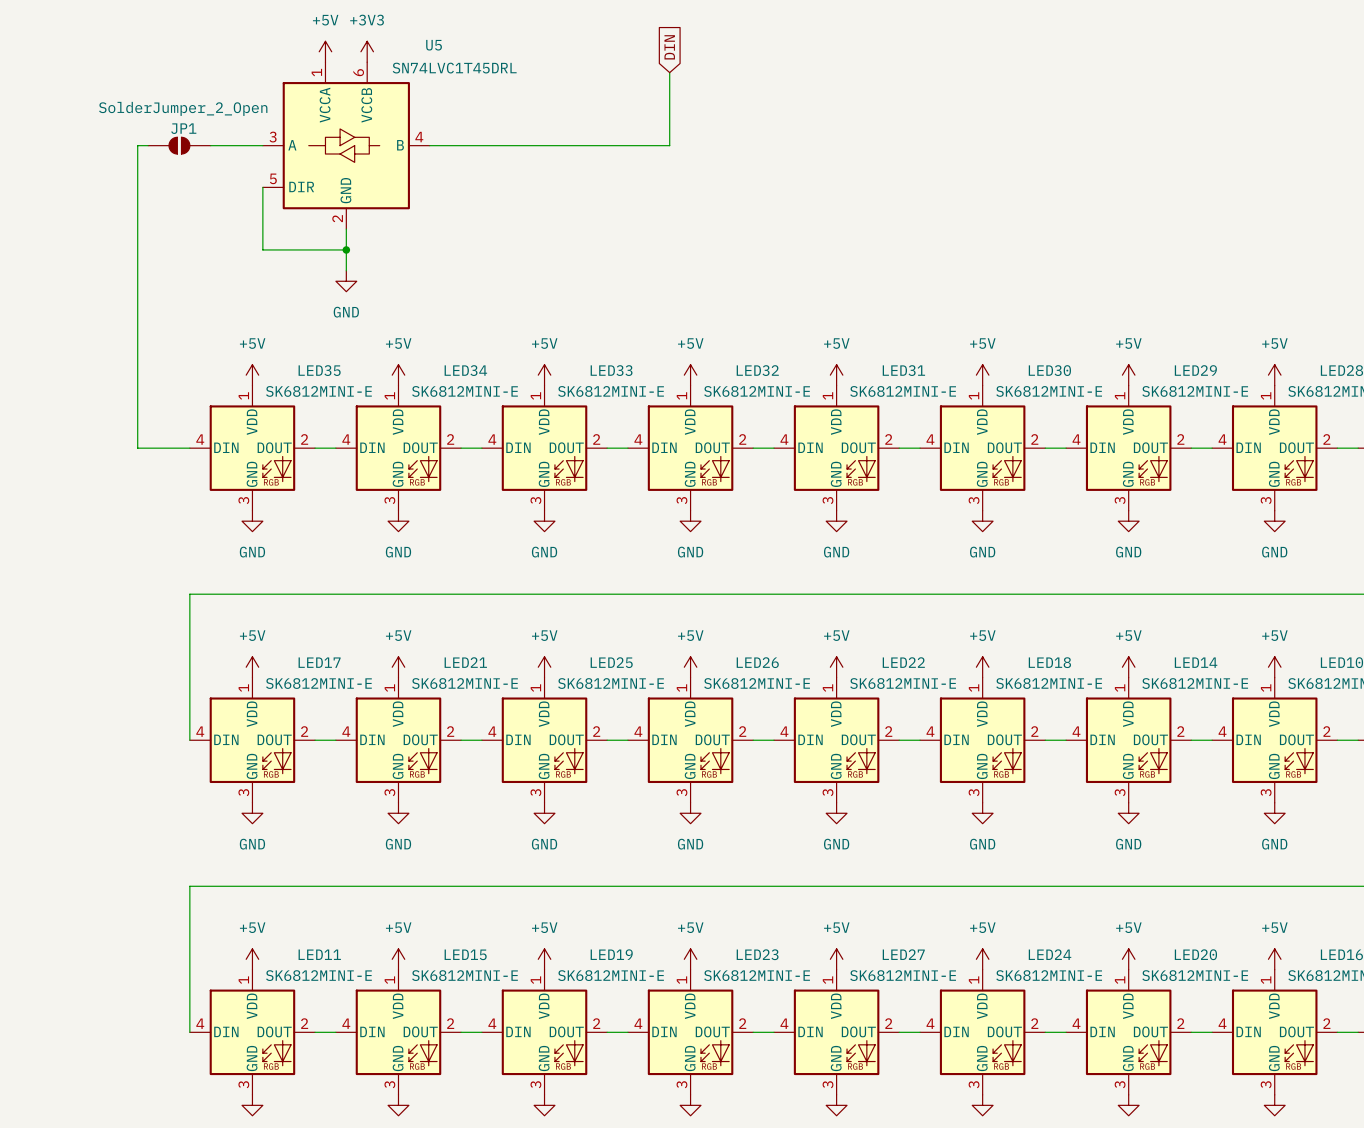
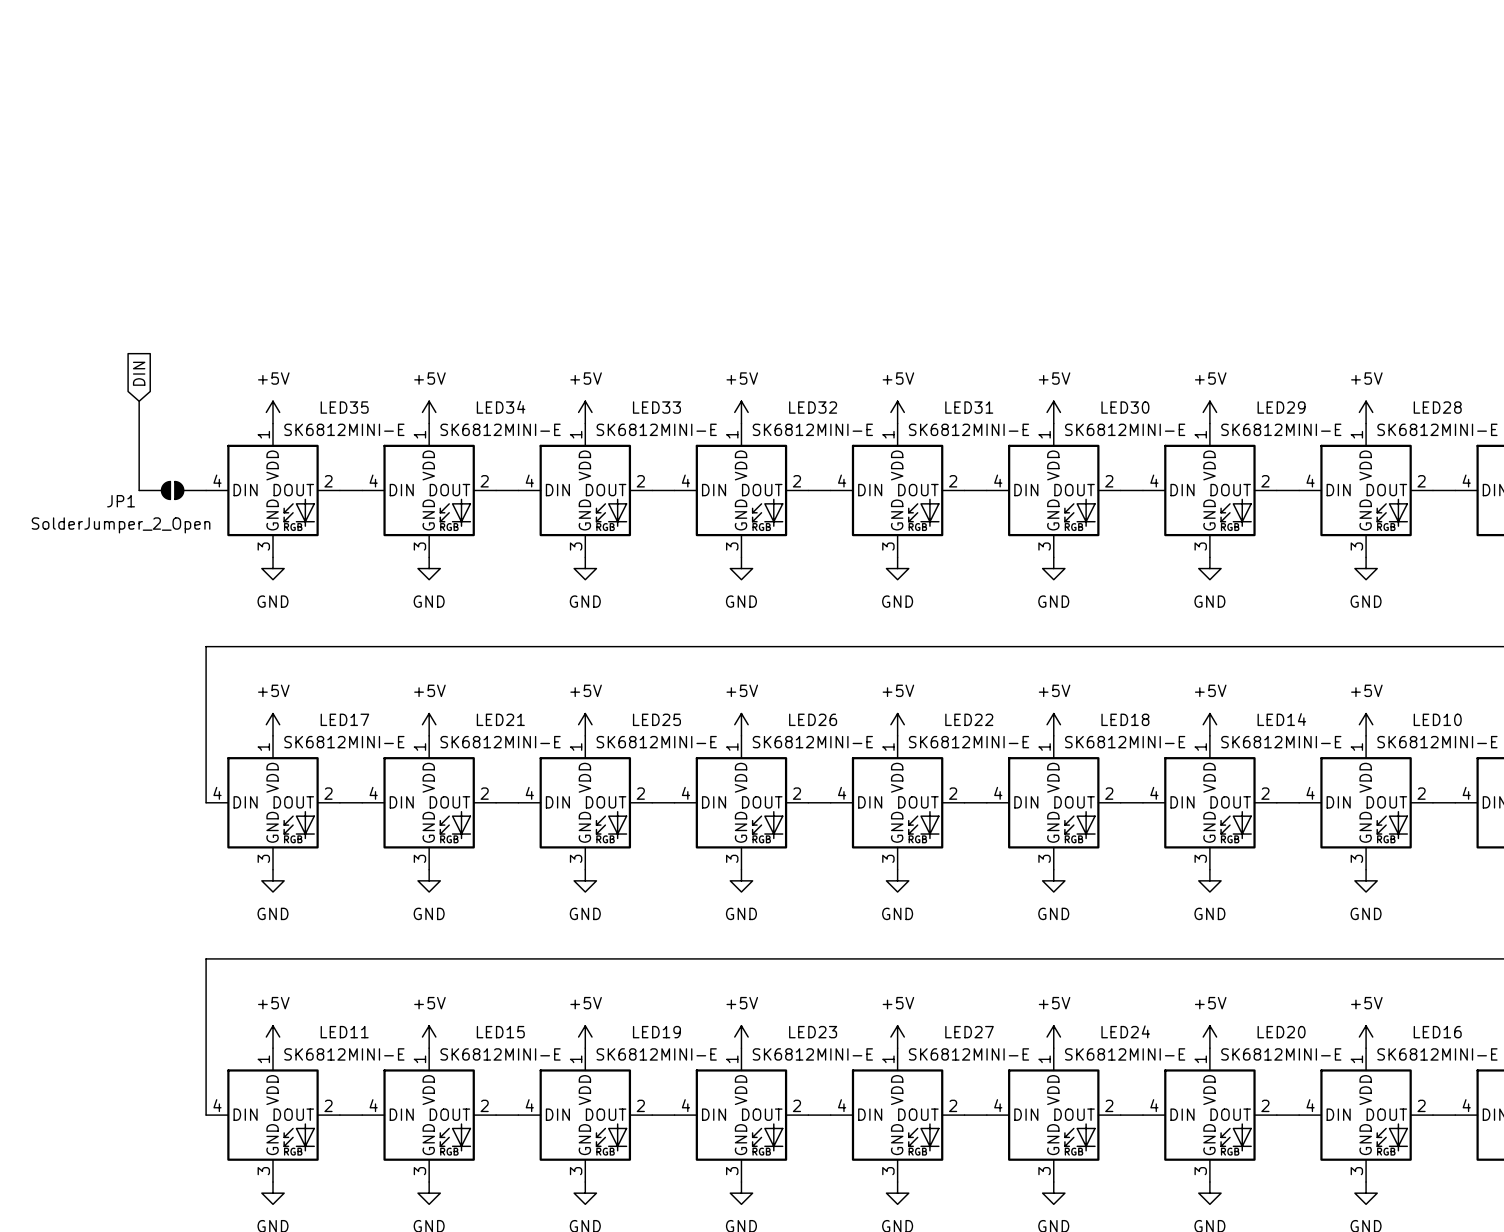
global label: DIN (669, 47) -> none
power symbol: +5V (325, 51) -> none
power symbol: +3V3 (367, 51) -> none
wire: (669, 72) (669, 145) (429, 145) -> none
JP1 value position: SolderJumper_2_Open (183, 108) -> SolderJumper_2_Open (121, 525)
JP1 name position: JP1 (183, 128) -> JP1 (121, 501)
wire: (148, 145) (137, 145) (137, 448) (189, 448) -> none
JP1 position: (179, 145) -> (172, 490)
wire: (210, 145) (262, 145) -> none
U5: SN74LVC1T45DRL (346, 145) -> none
wire: (262, 187) (262, 249) (346, 249) -> none
wire: (346, 229) (346, 270) -> none
junction: (346, 249) -> none
power symbol: GND (346, 281) -> none
global label: none -> DIN (139, 373)
wire: none -> (139, 401) (139, 490)

